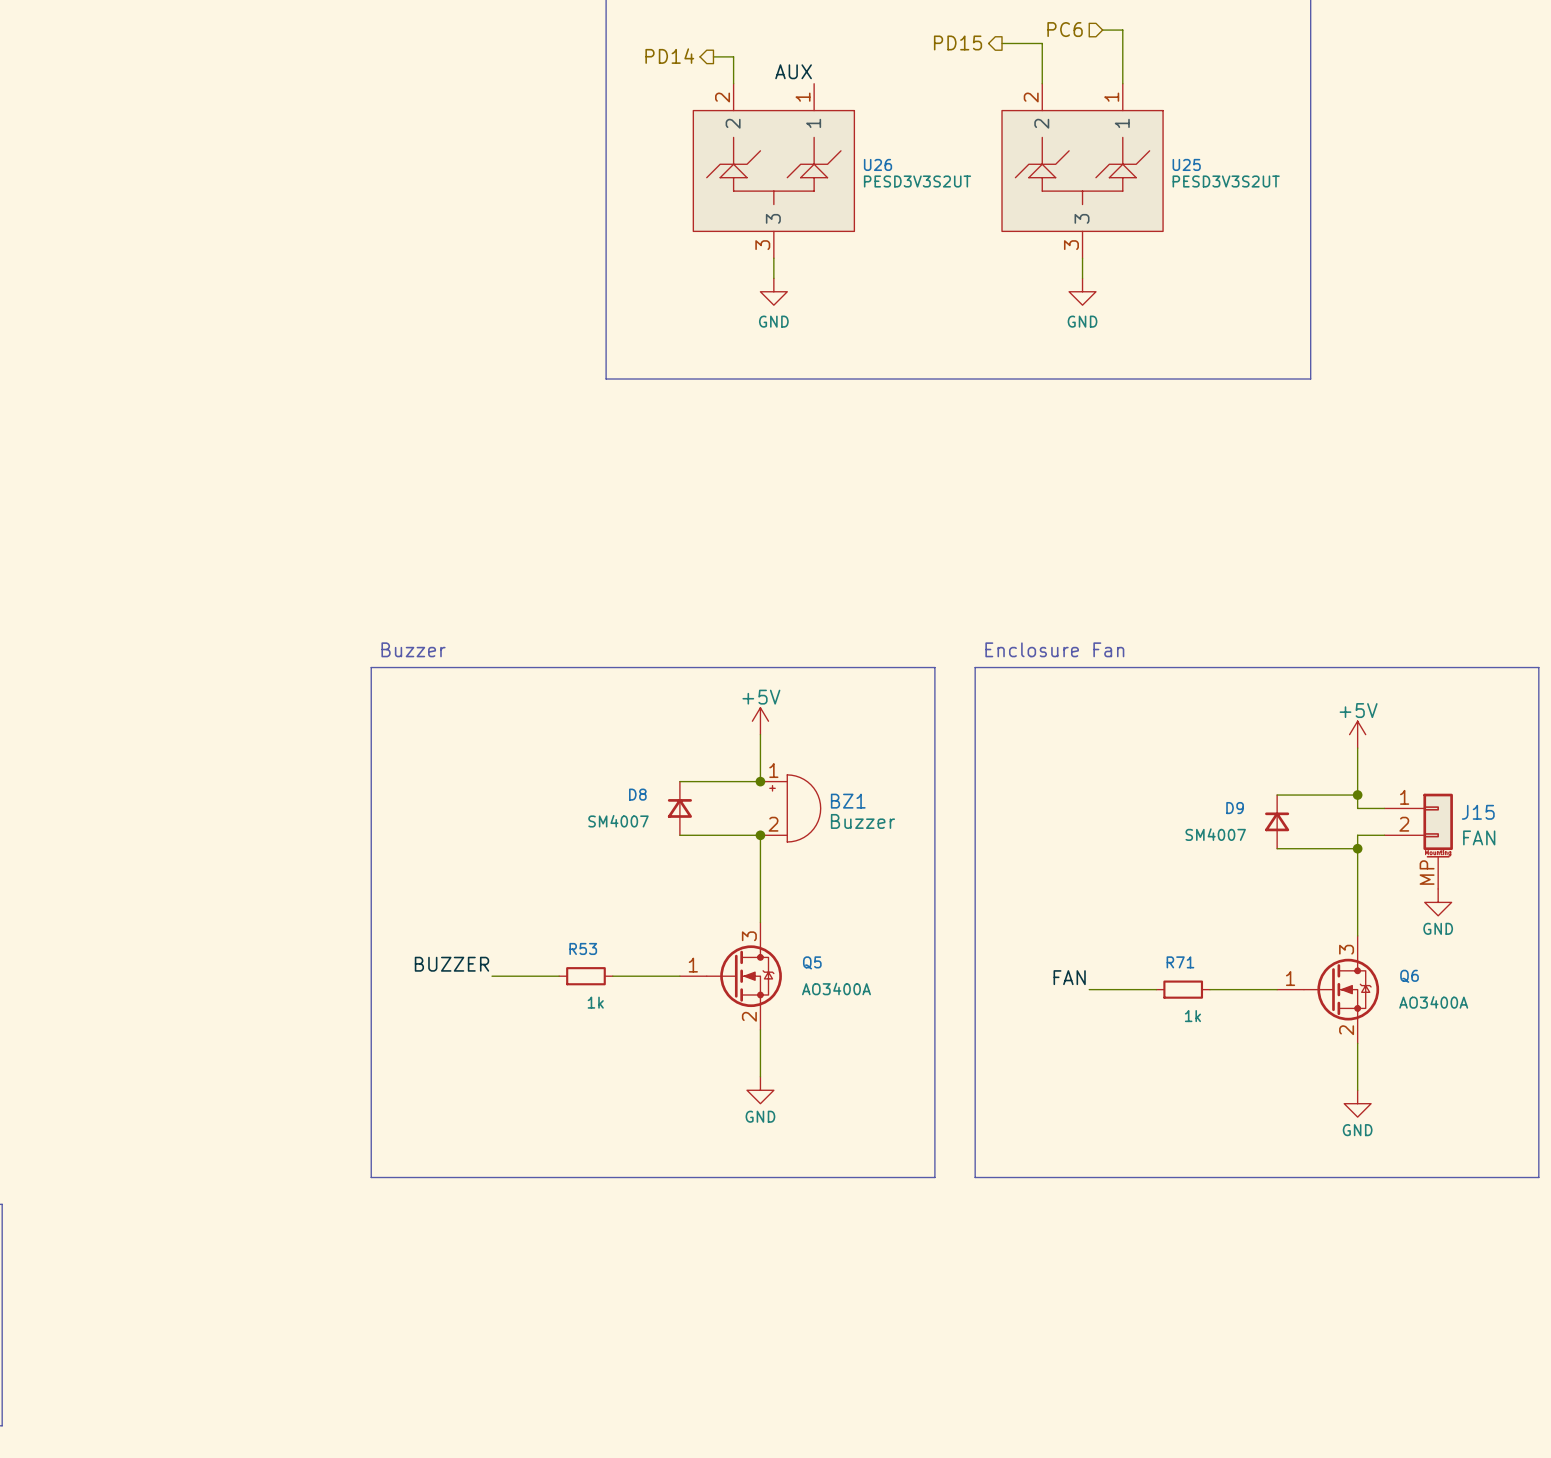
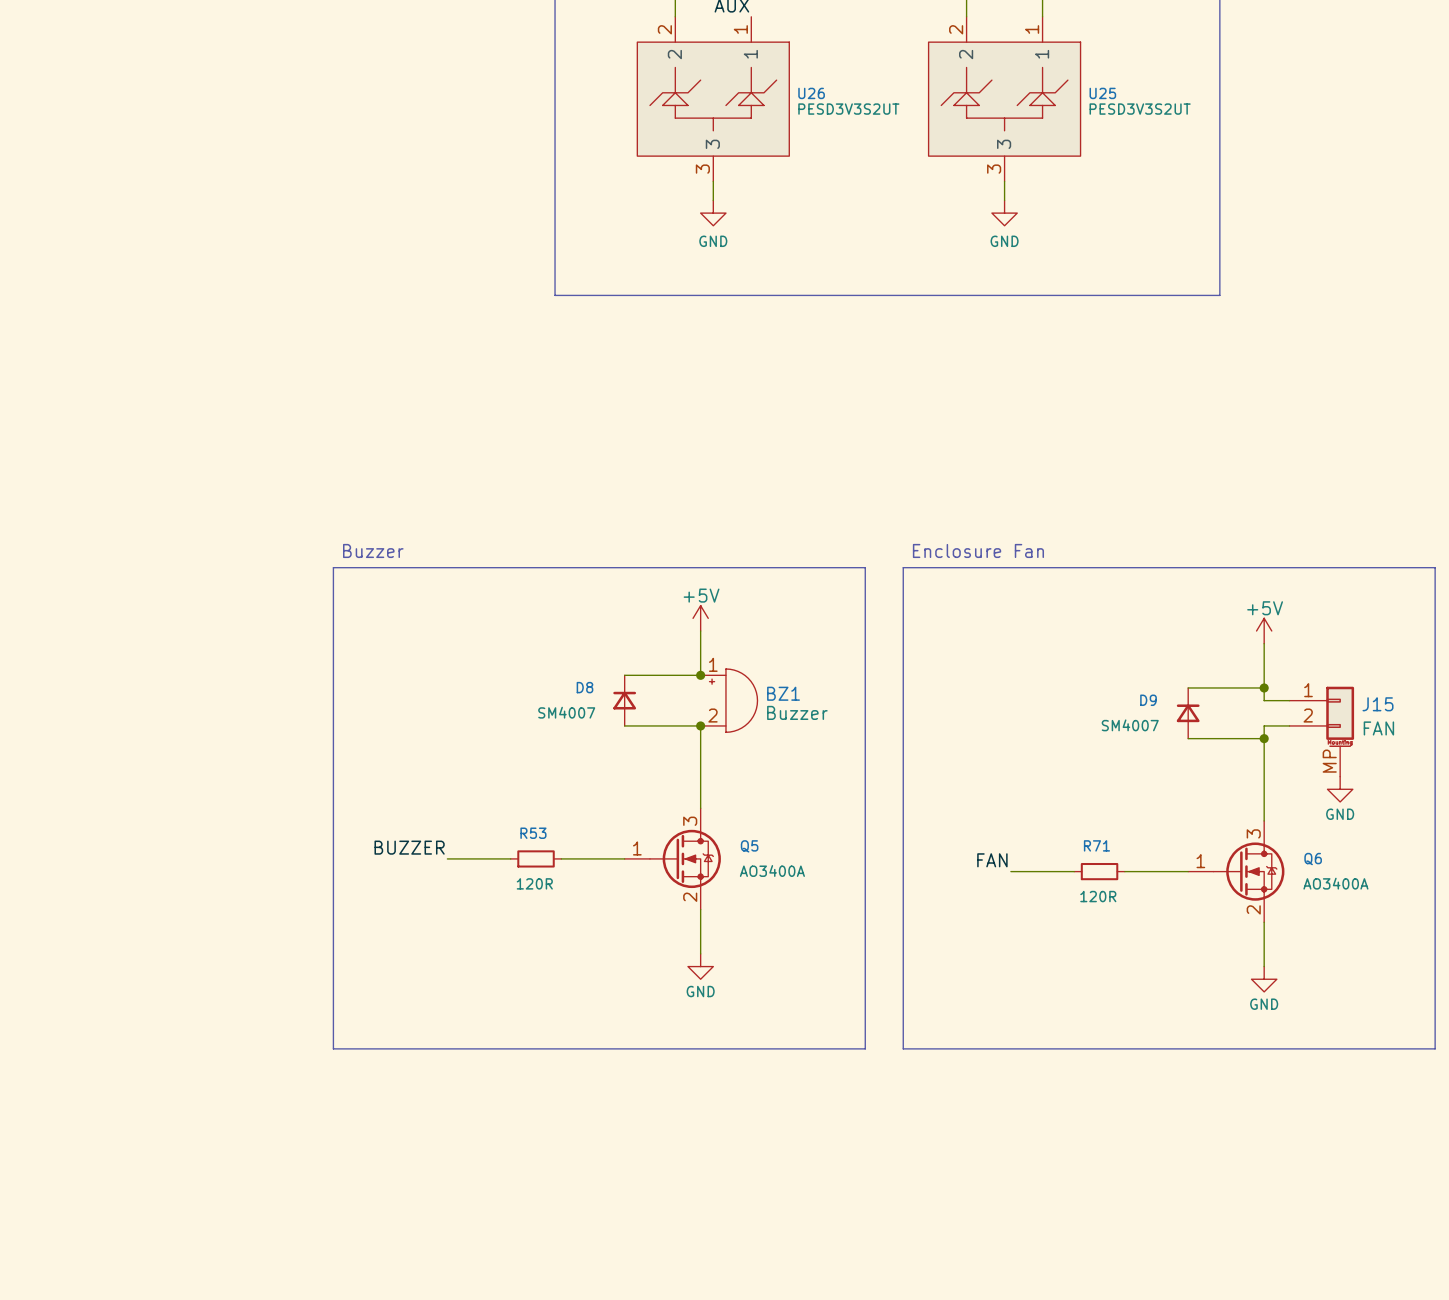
R53 value: 1k (595, 1002) -> 120R (534, 883)
R71 value: 1k (1192, 1016) -> 120R (1098, 896)

